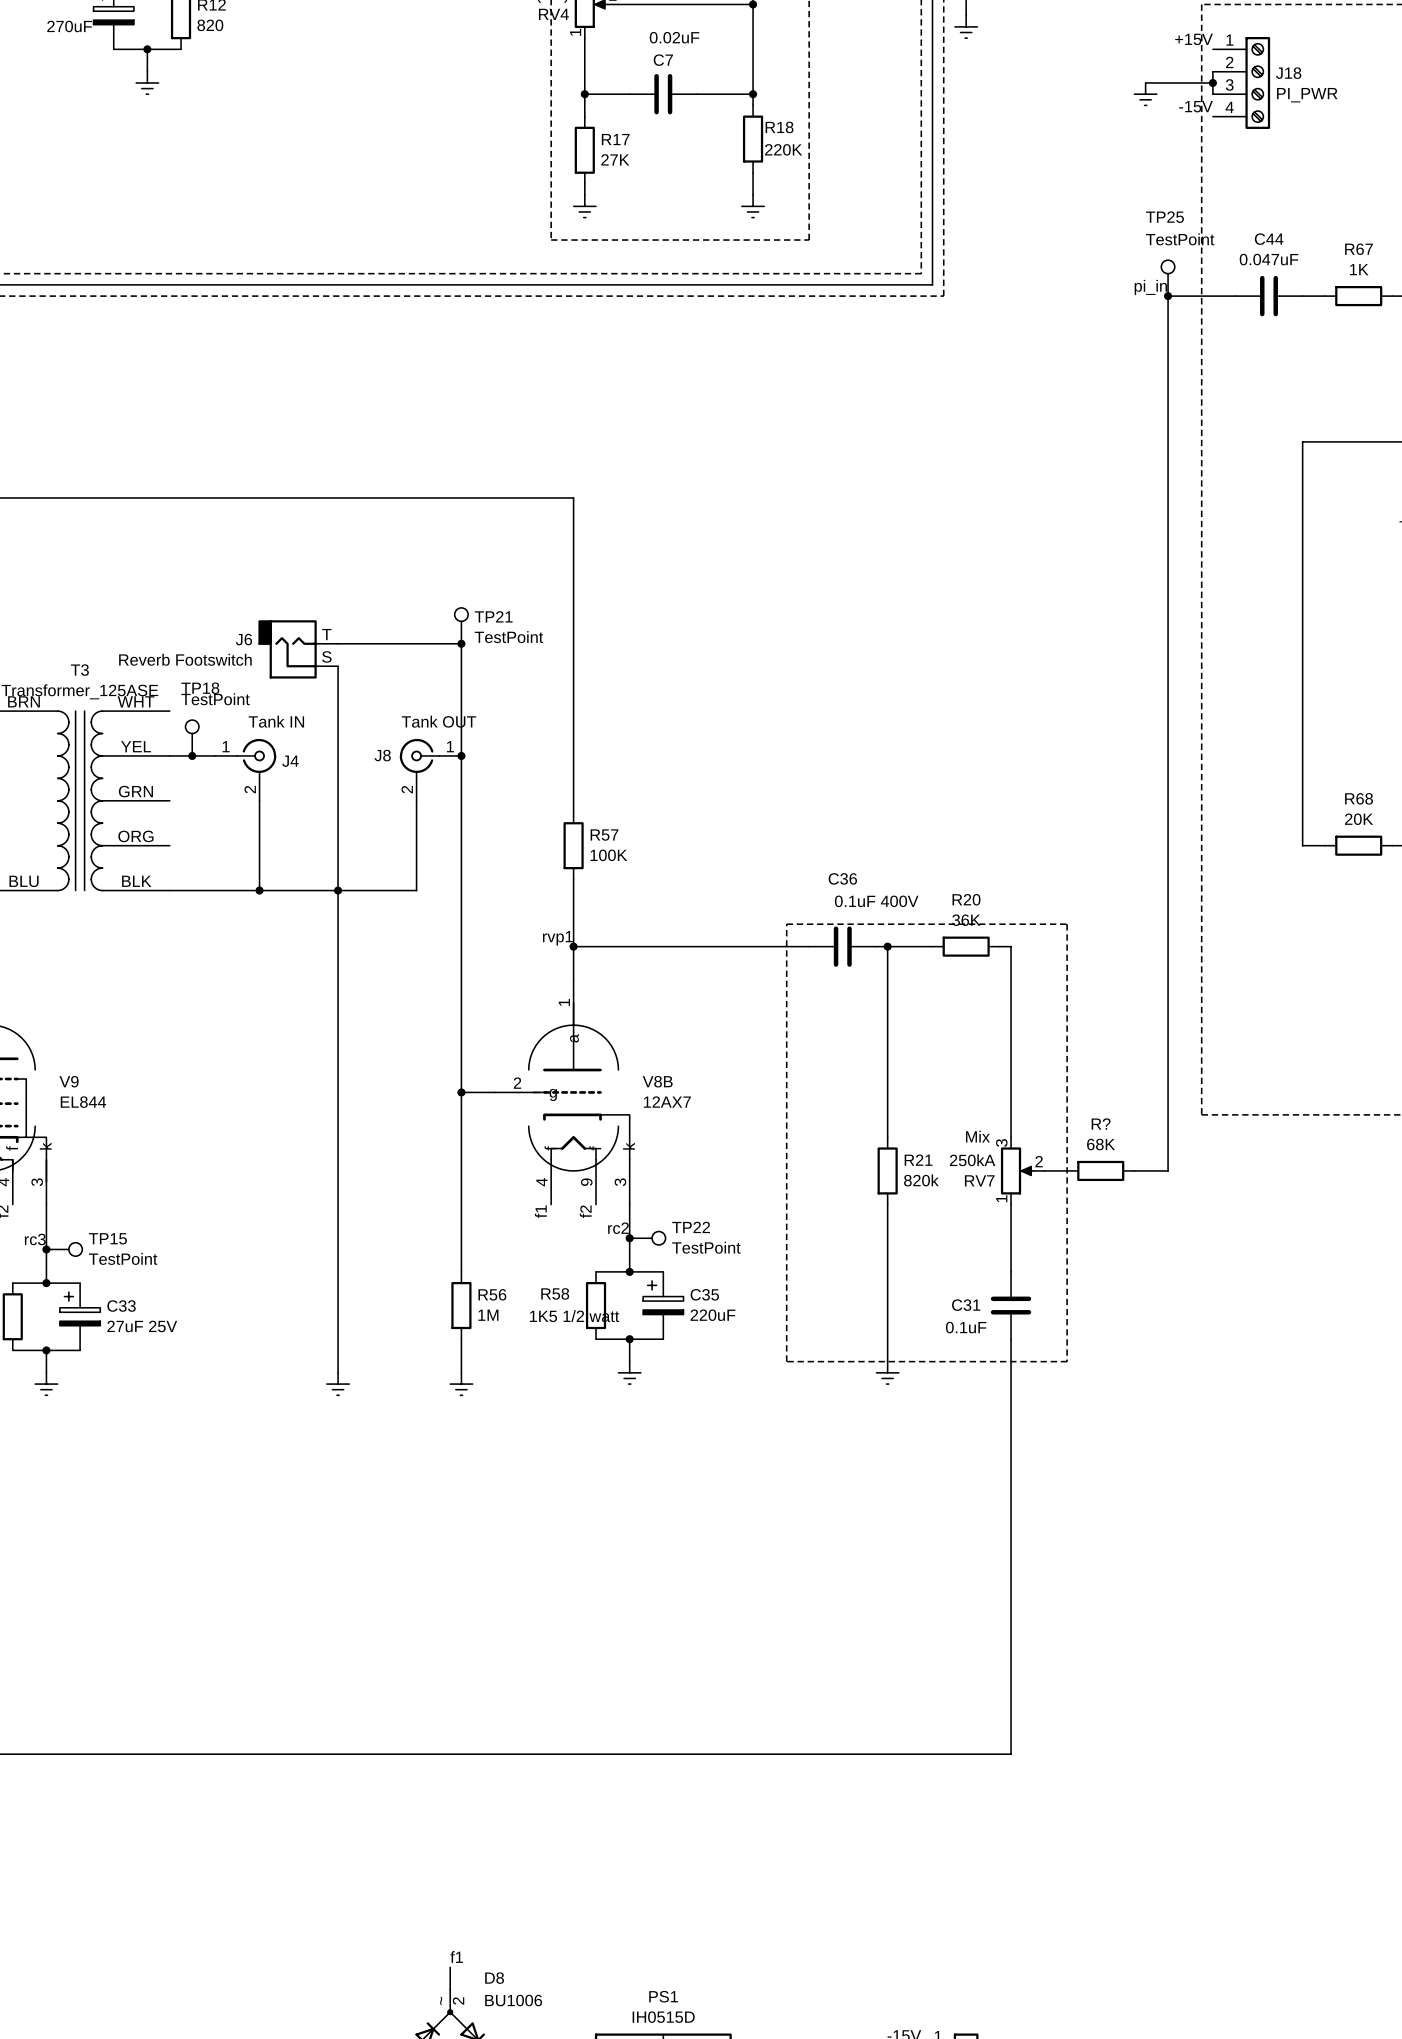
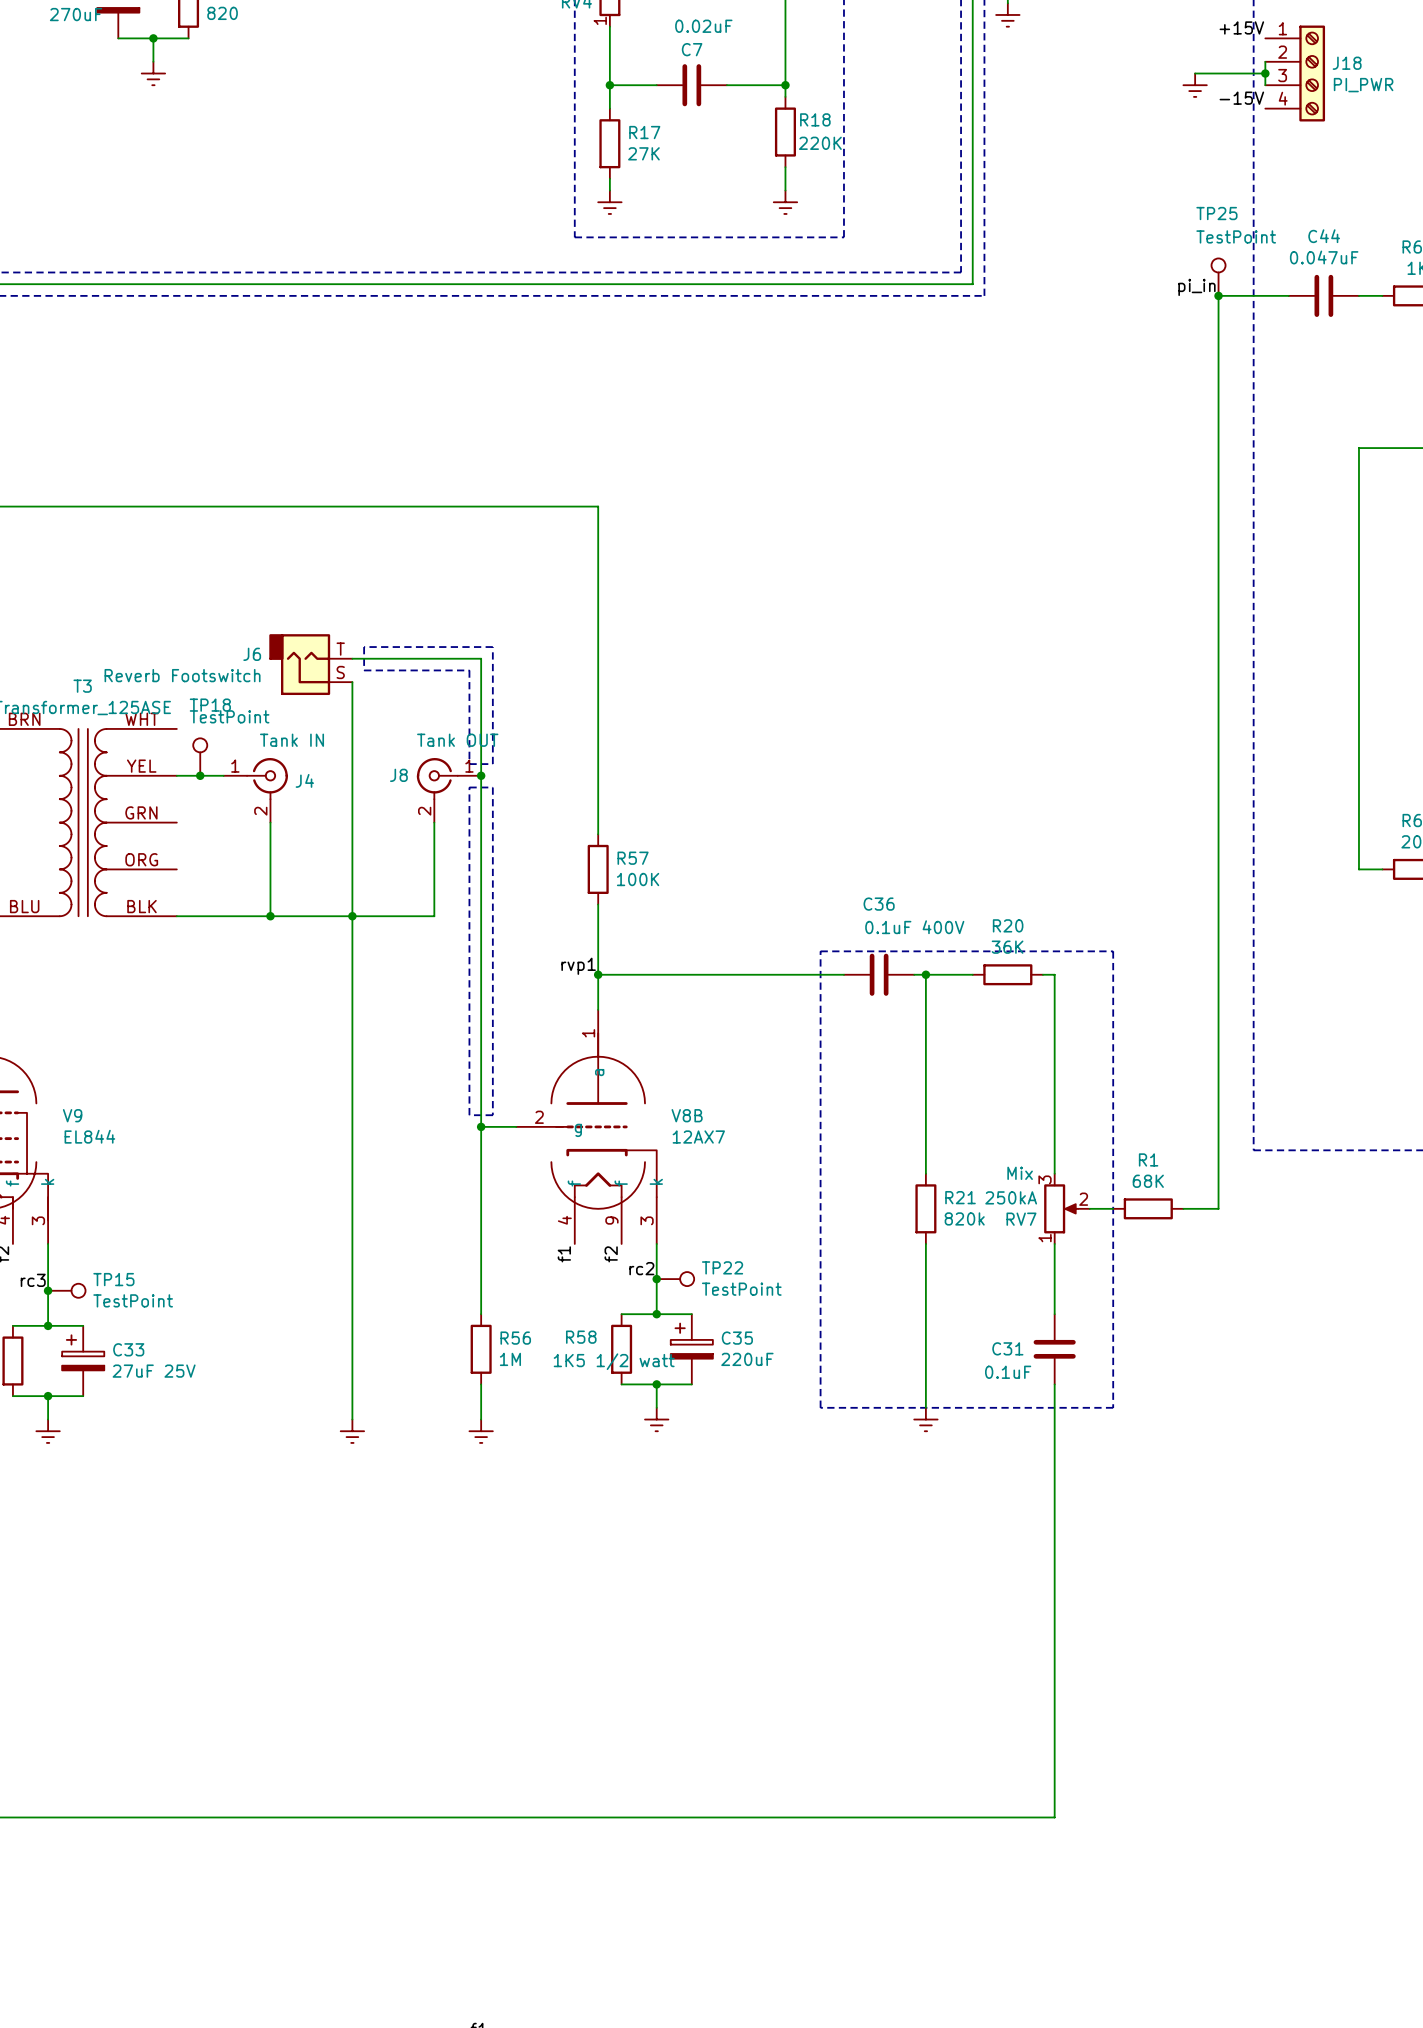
TP21: TestPoint (461, 625) -> none
line: none -> (364, 647) (492, 647) (492, 764) (469, 764) (469, 670) (364, 670) (364, 647)
junction: (461, 643) -> none
line: none -> (469, 787) (492, 787) (492, 1115) (469, 1115) (469, 787)
R? name: R? (1101, 1124) -> R1 (1148, 1159)

